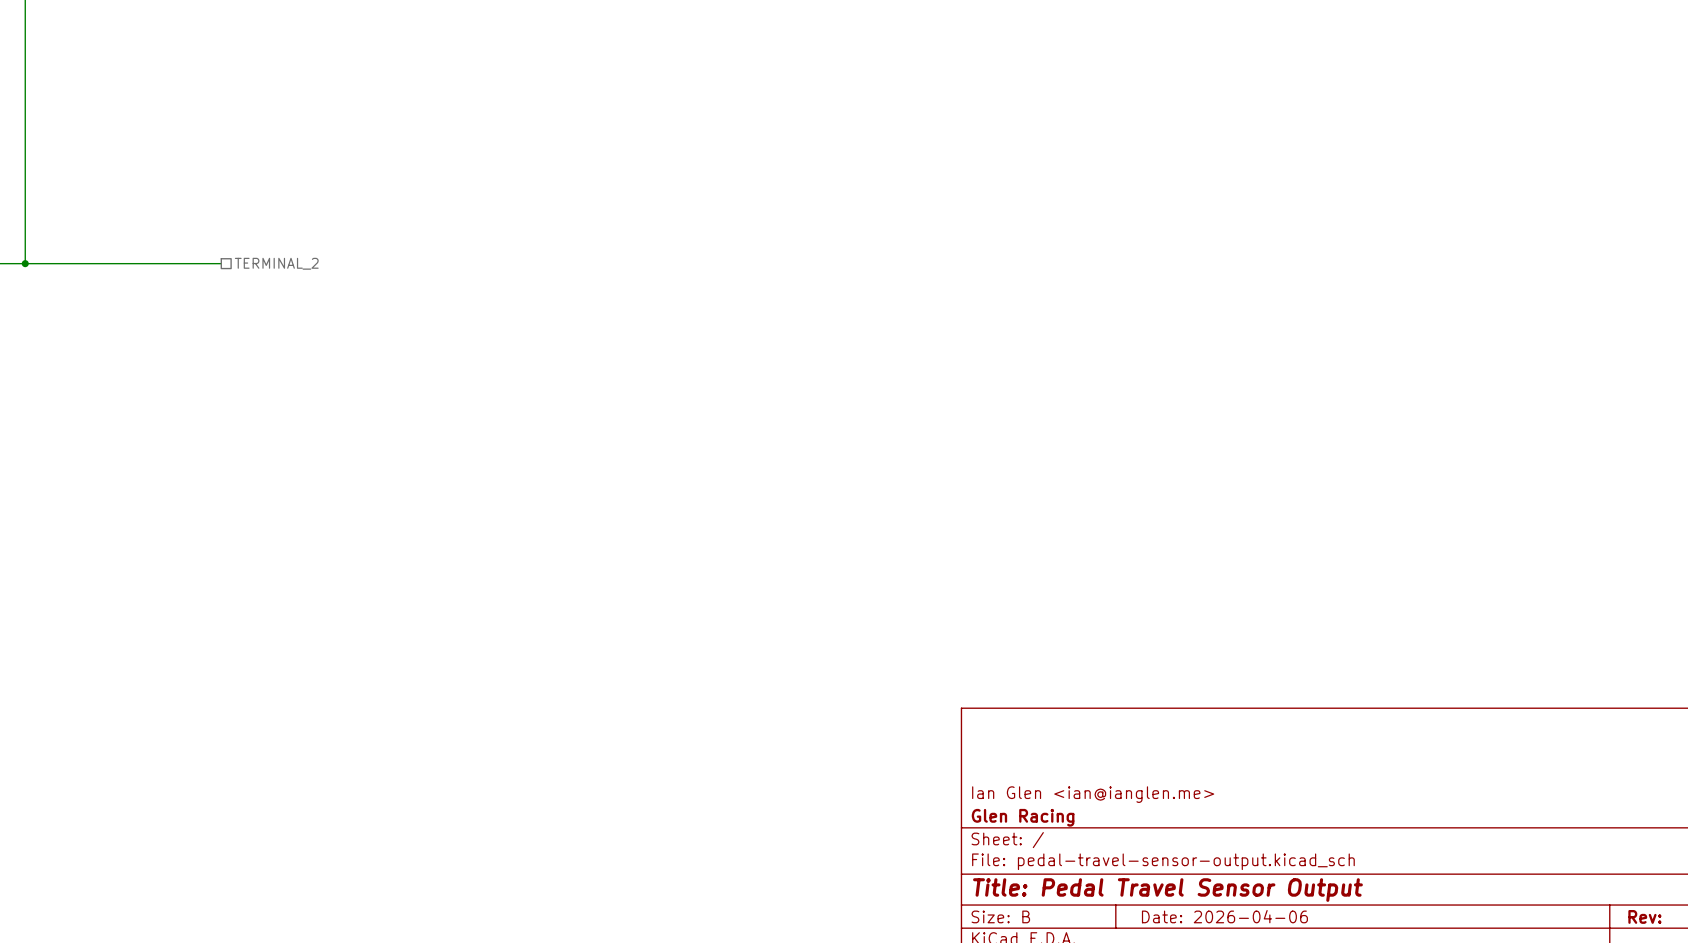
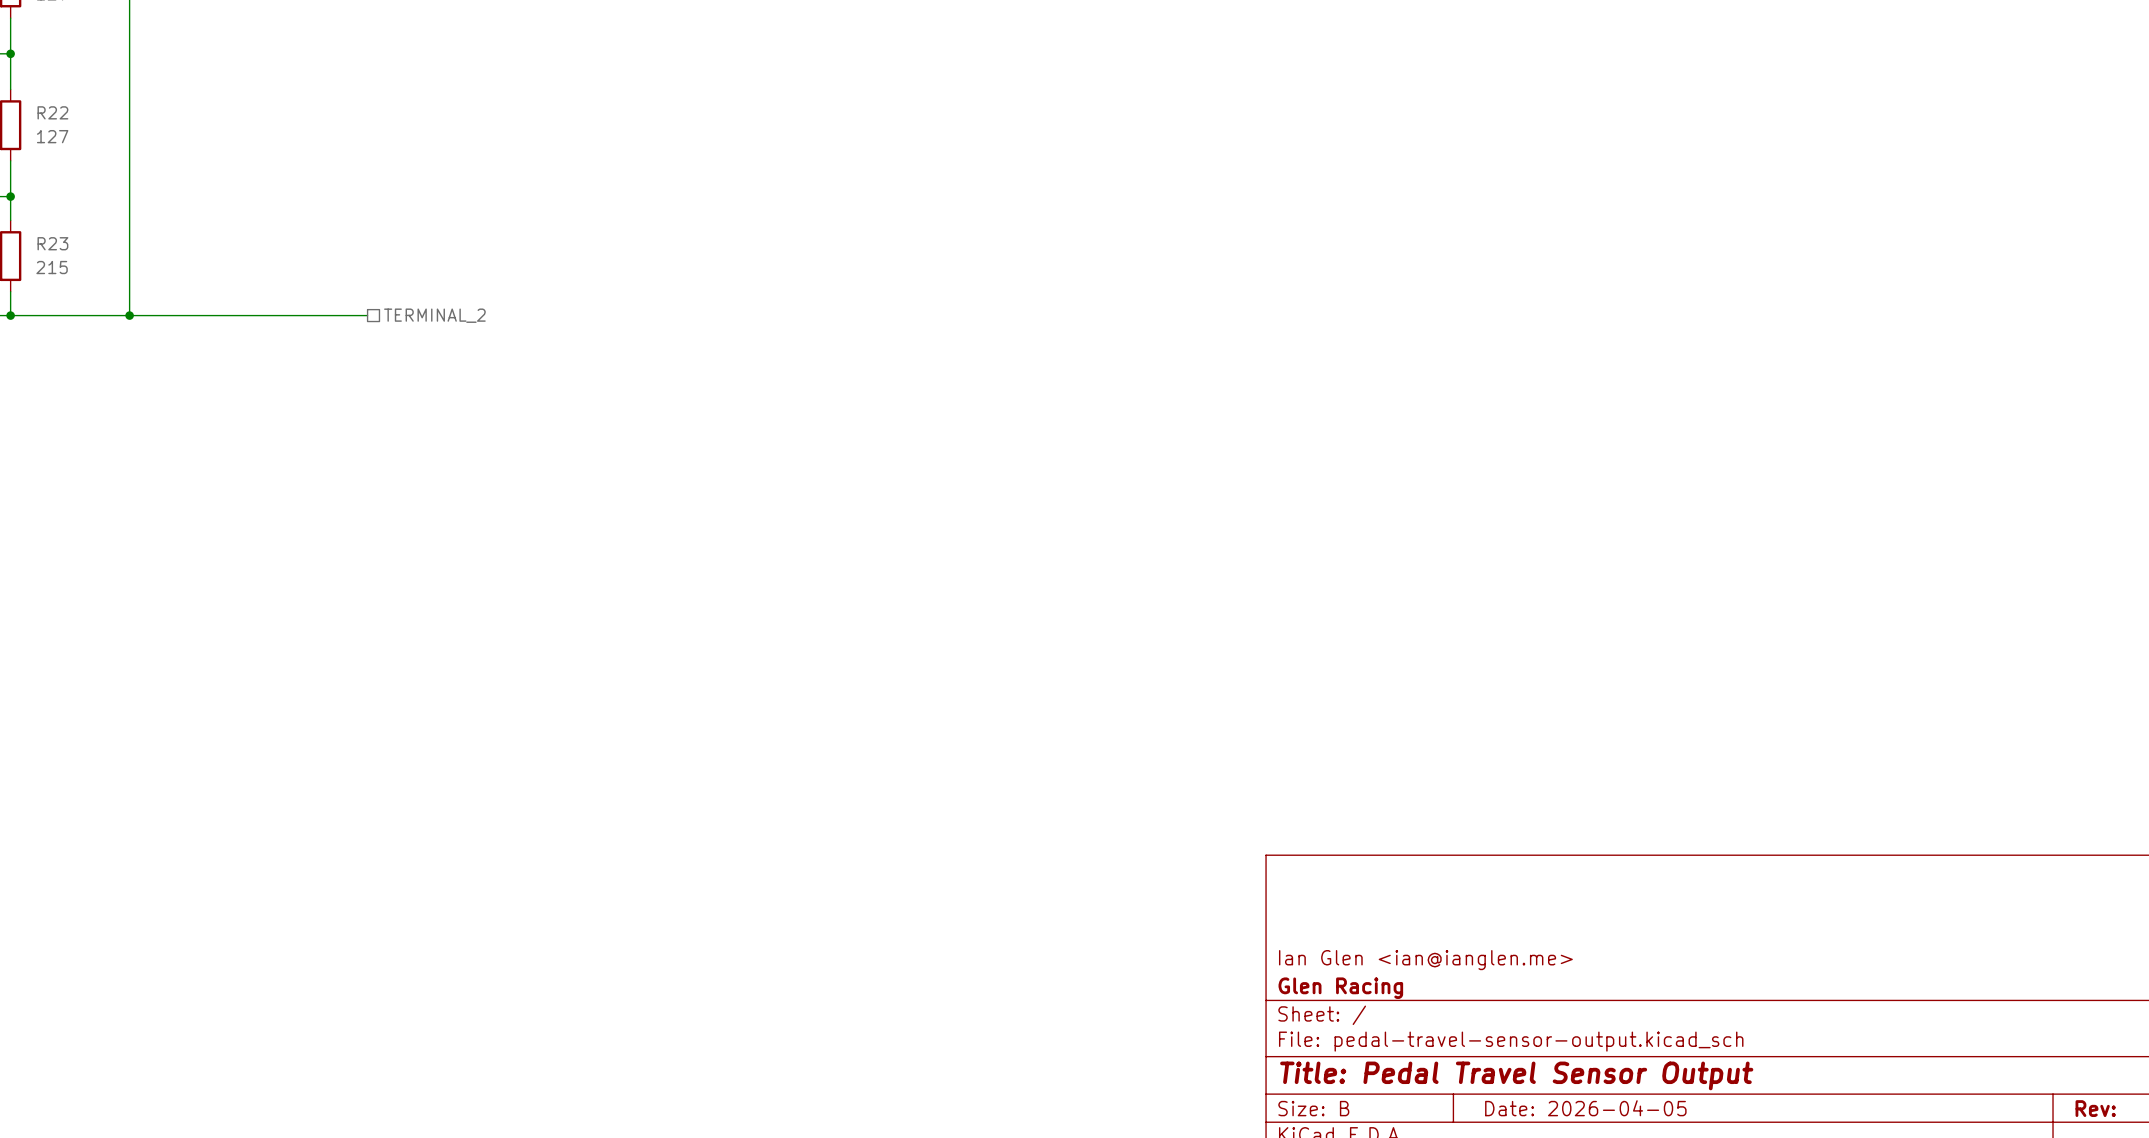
title block: Date: 2026-04-06 (1224, 916) -> Date: 2026-04-05 (1585, 1108)

